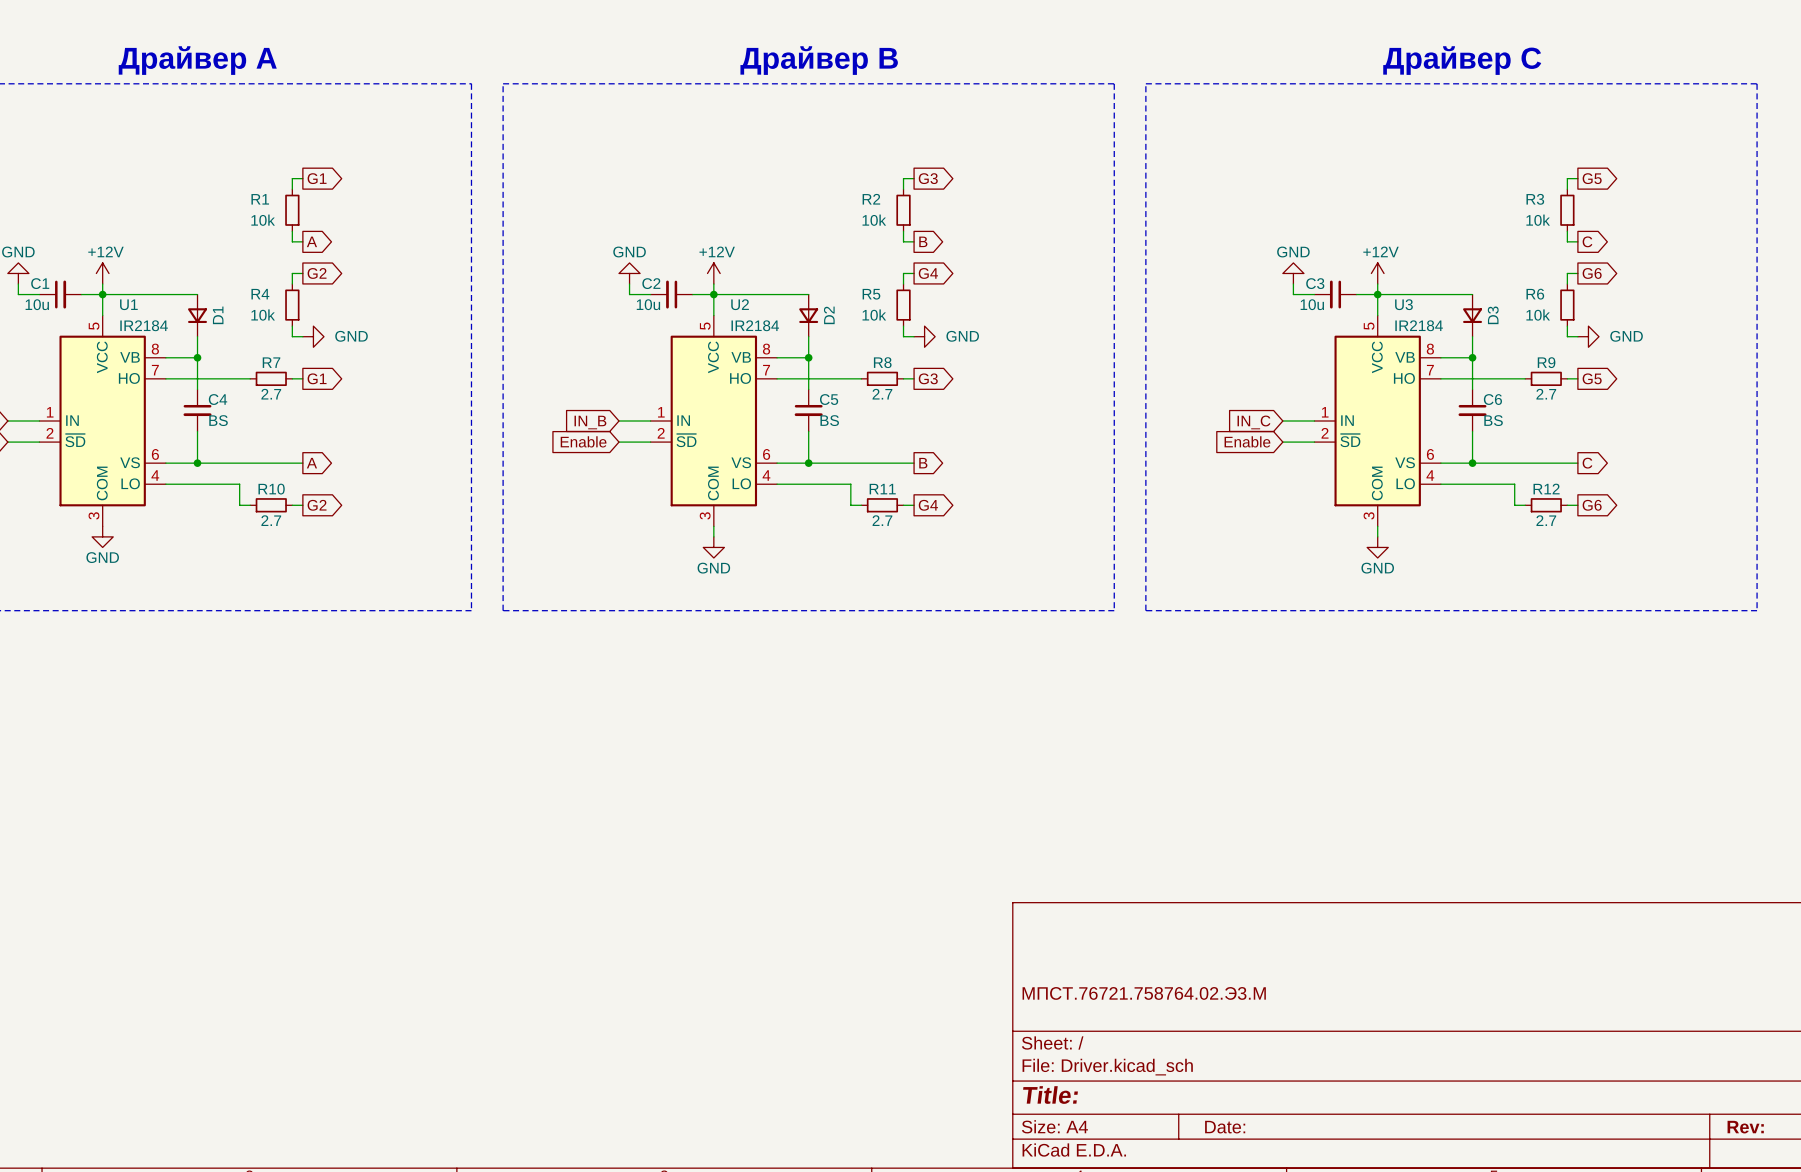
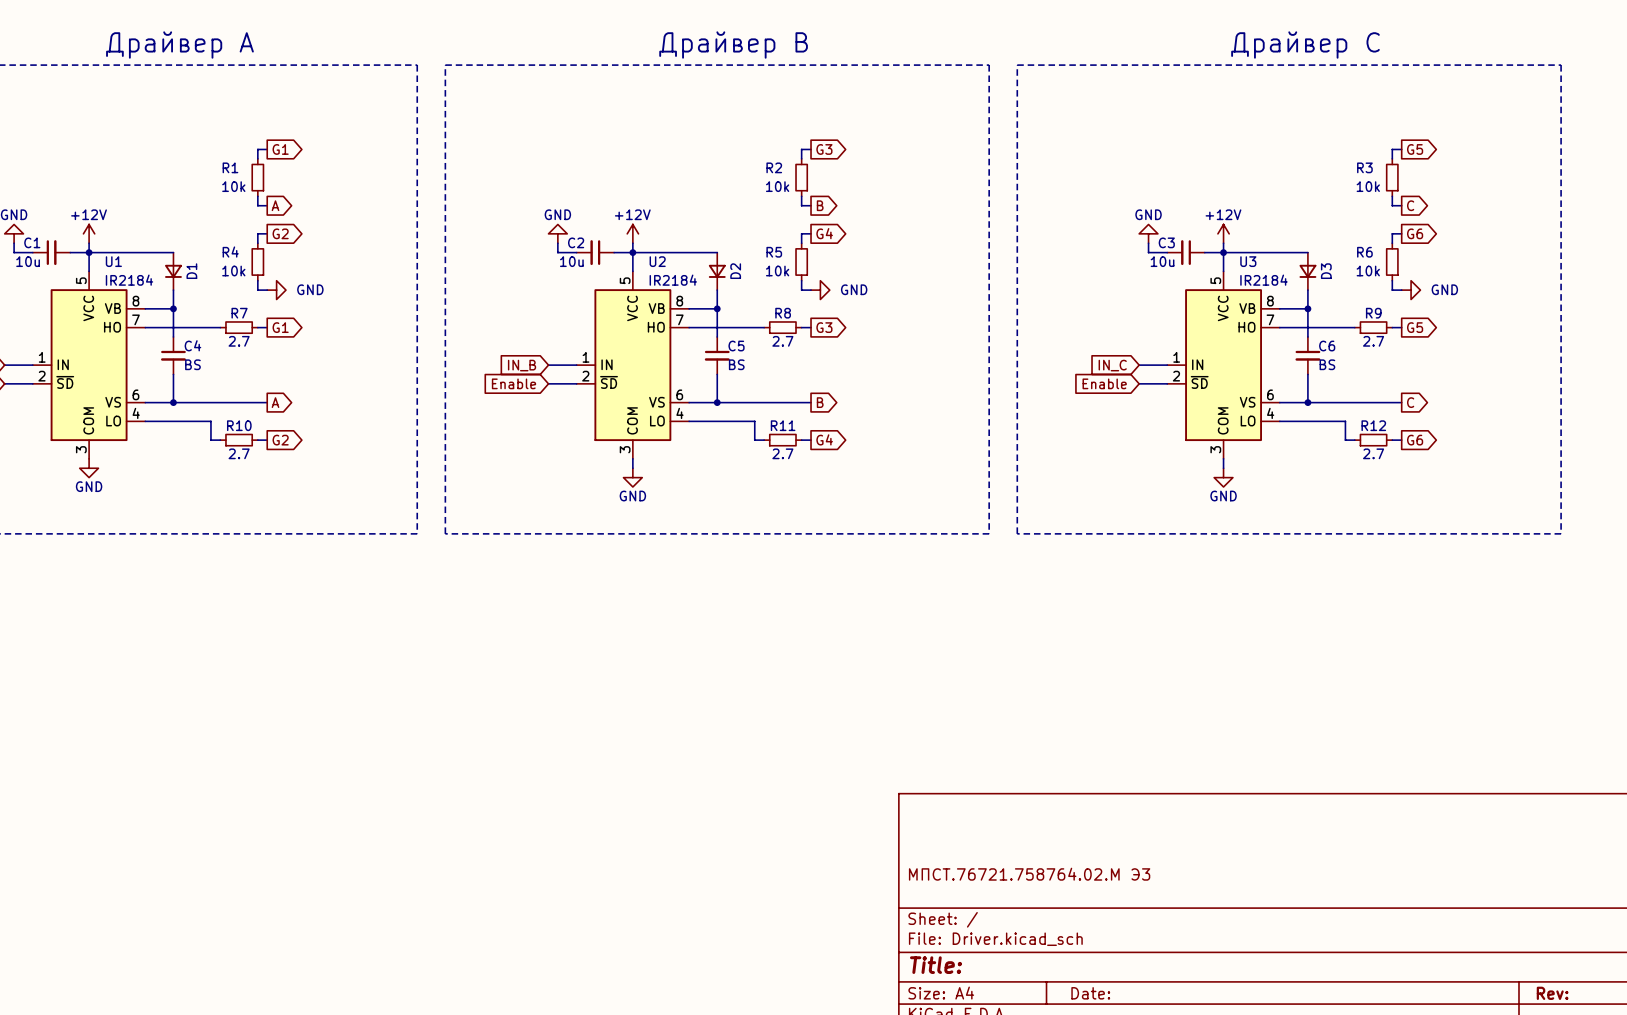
title block: МПСТ.76721.758764.02.Э3.М (1144, 993) -> МПСТ.76721.758764.02.М Э3 (1029, 874)

